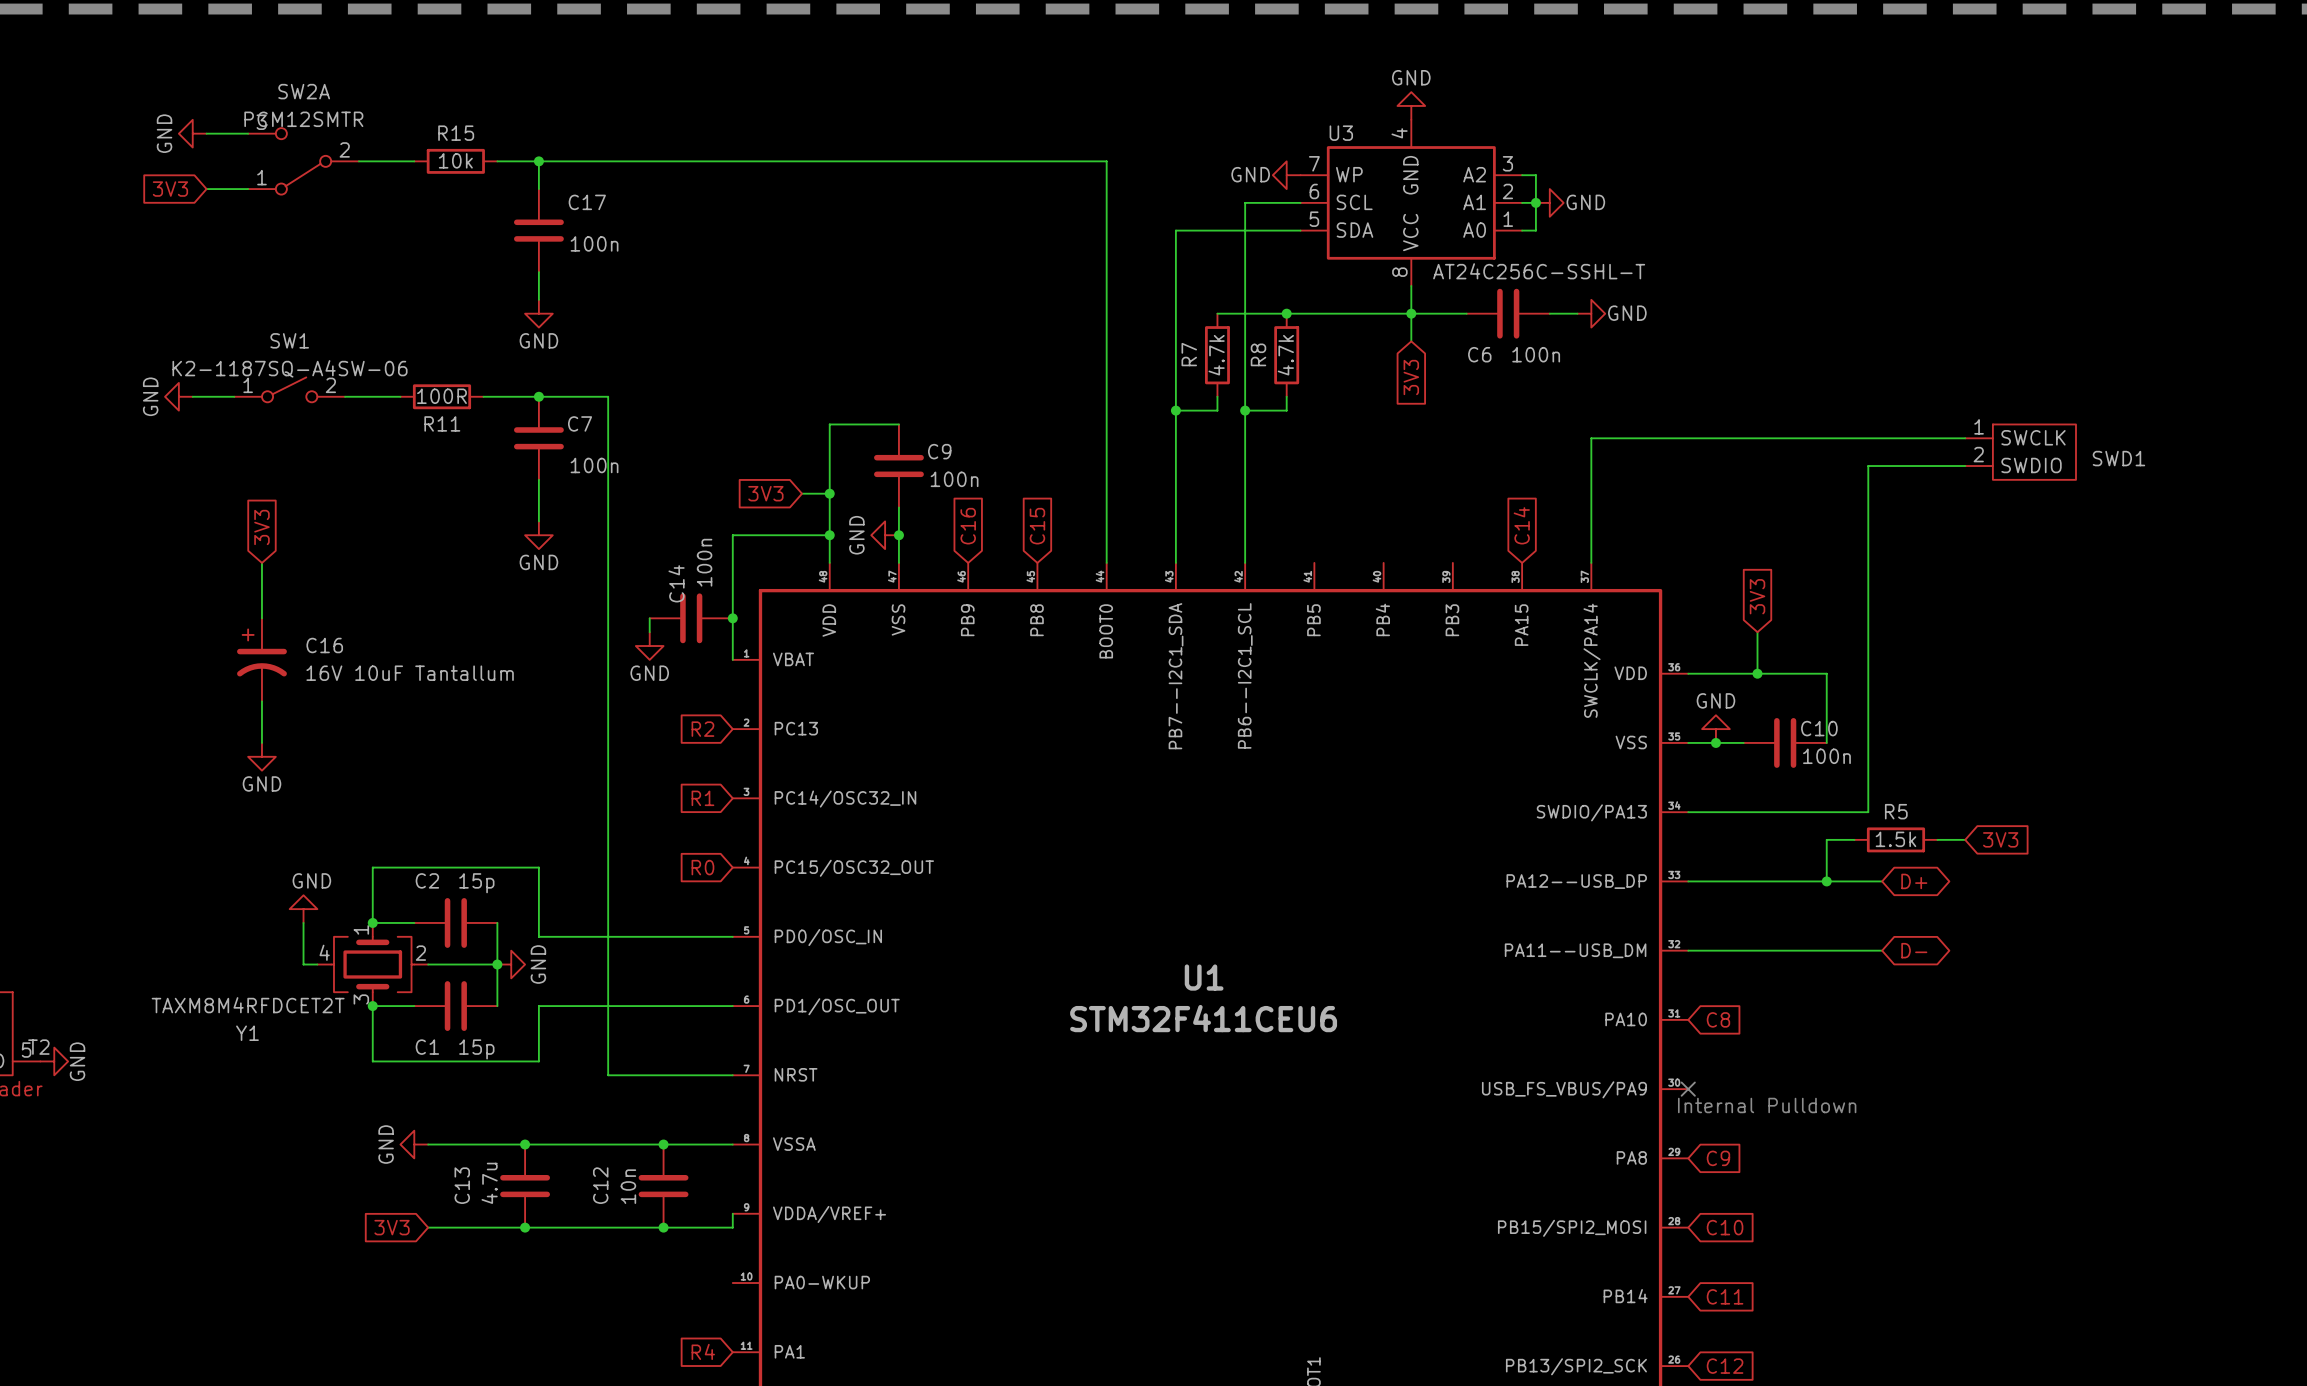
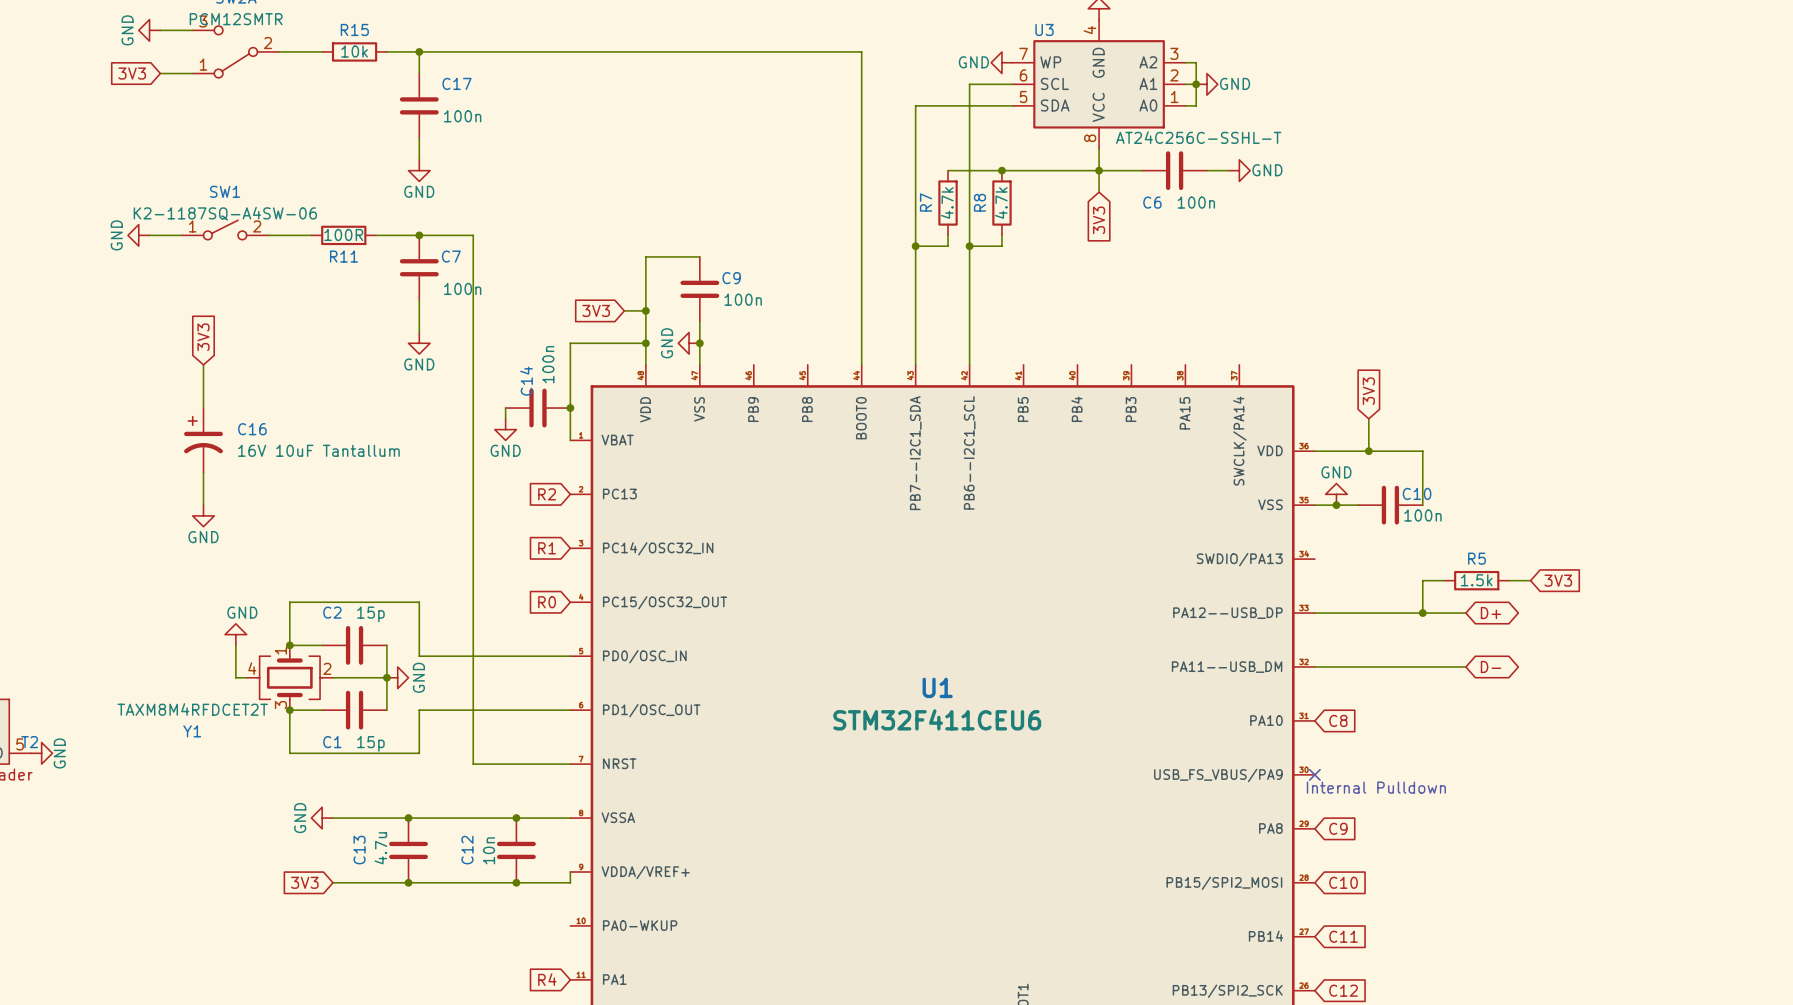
wire: (1965, 438) (1591, 438) (1591, 562) -> none
SWD1: (2020, 452) -> none
wire: (1965, 466) (1868, 466) (1868, 812) (1688, 812) -> none
global label: C14 (1521, 525) -> none
global label: C16 (968, 526) -> none
global label: C15 (1037, 526) -> none

